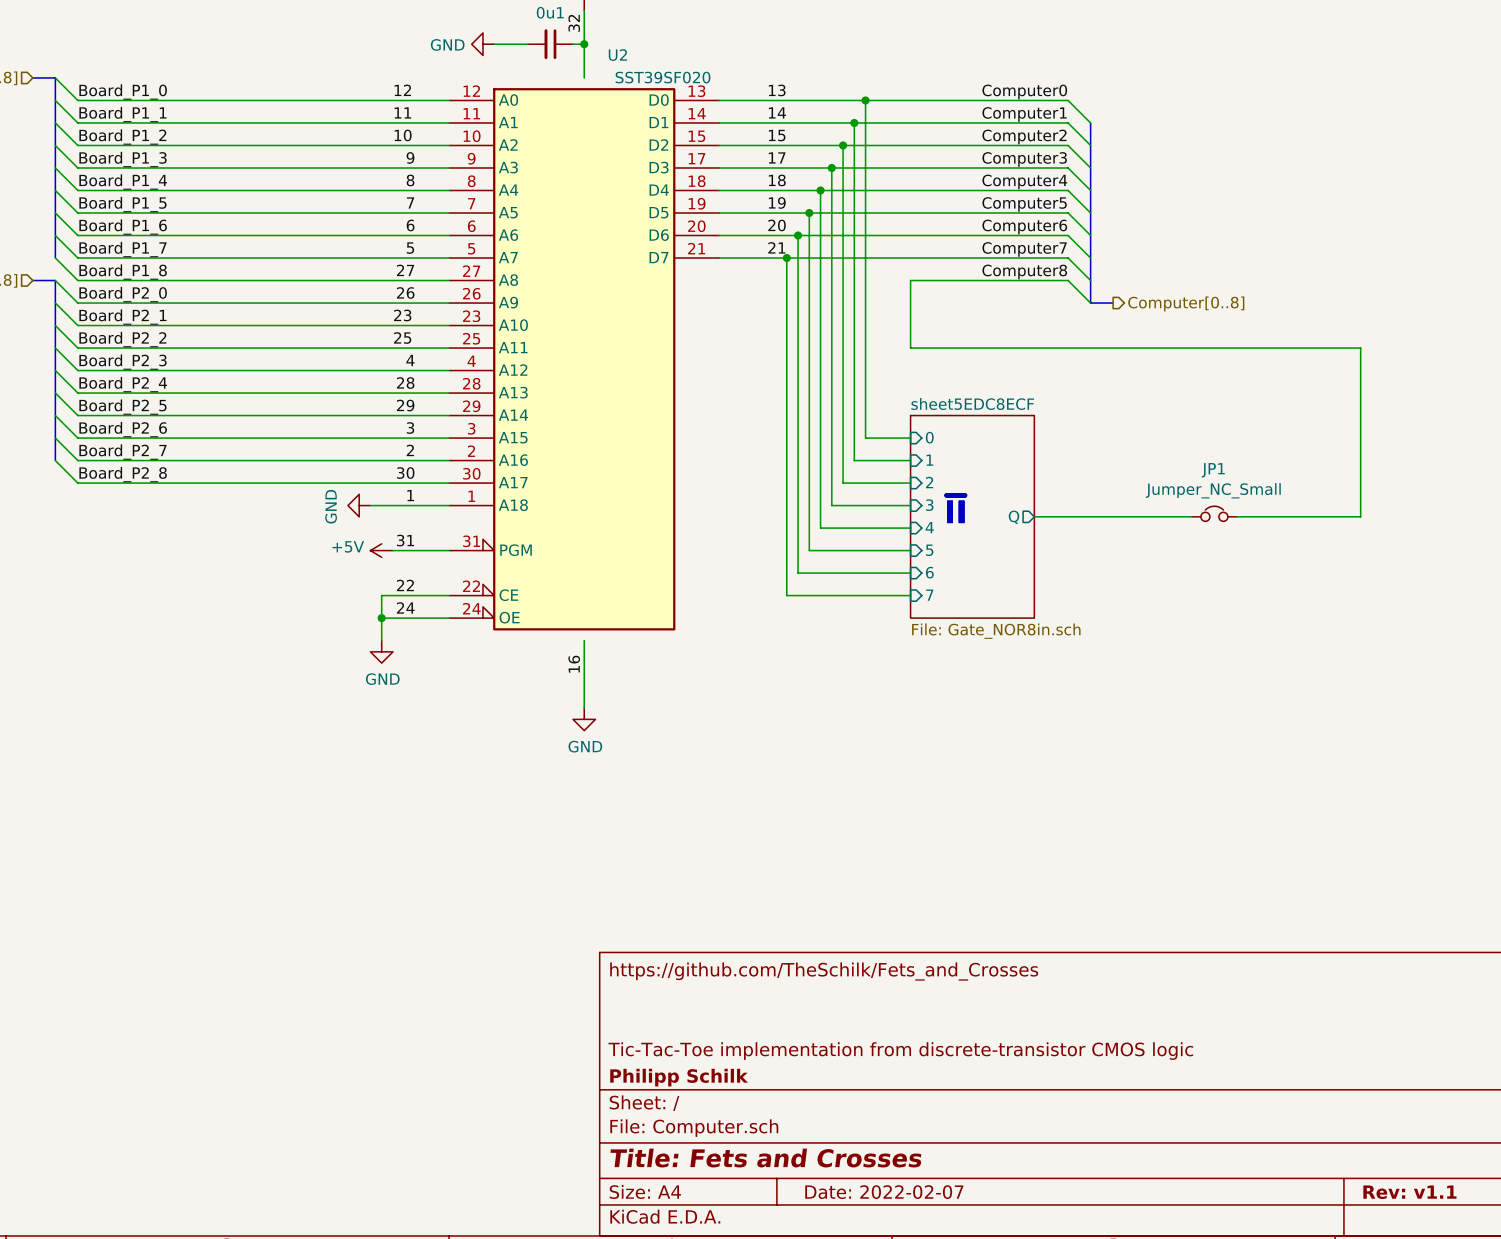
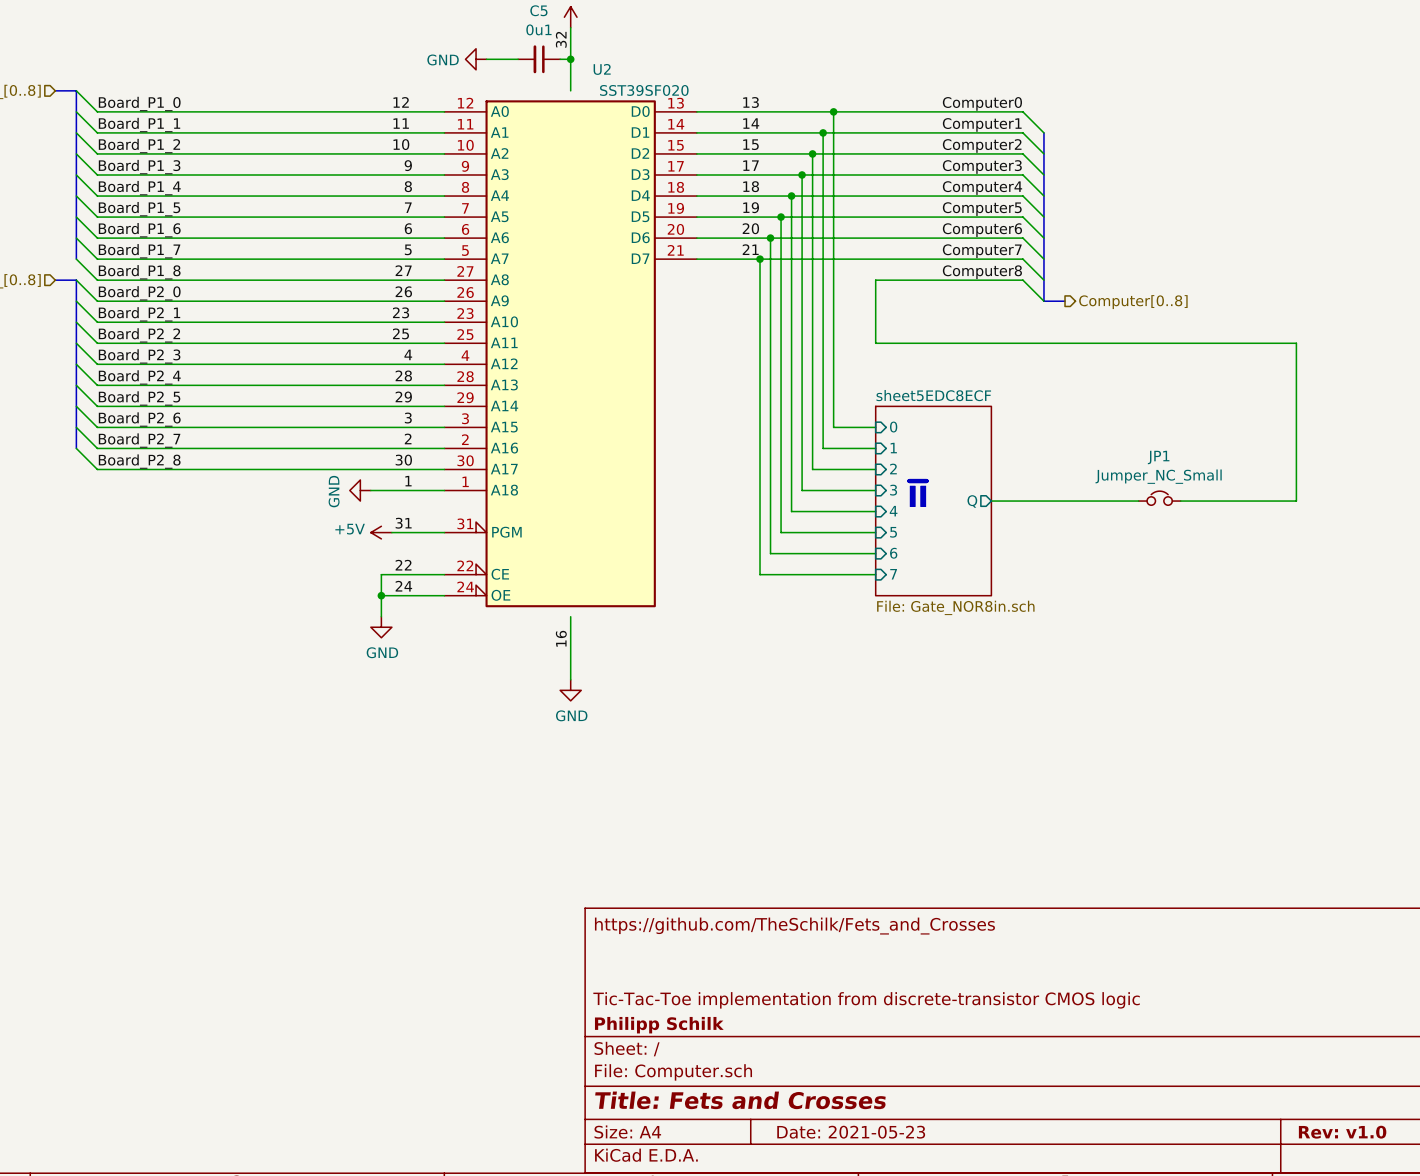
title block: Date: 2022-02-07 (884, 1192) -> Date: 2021-05-23 (851, 1132)
title block: Rev: v1.1 (1409, 1192) -> Rev: v1.0 (1342, 1132)

